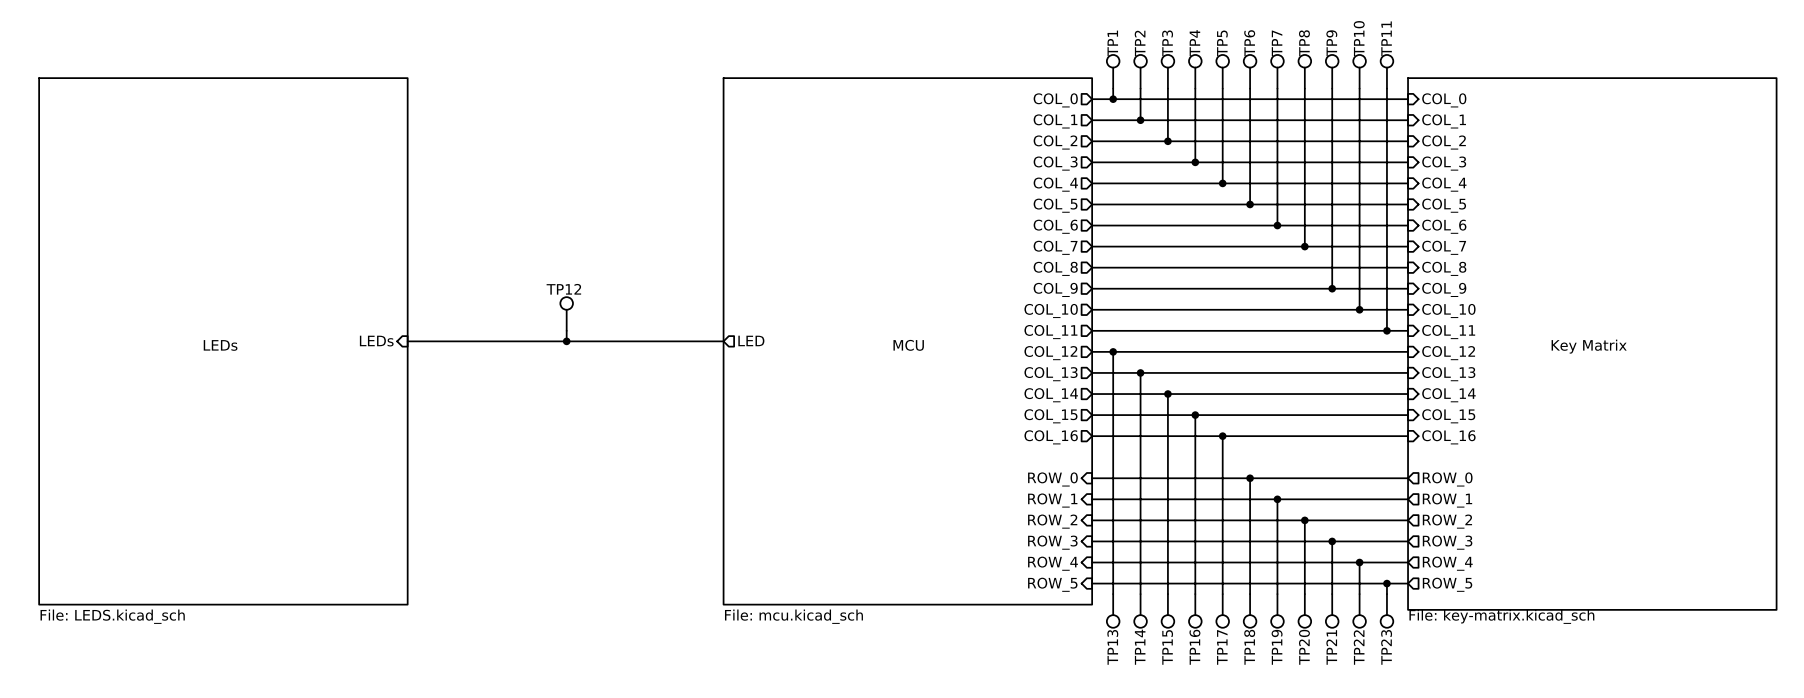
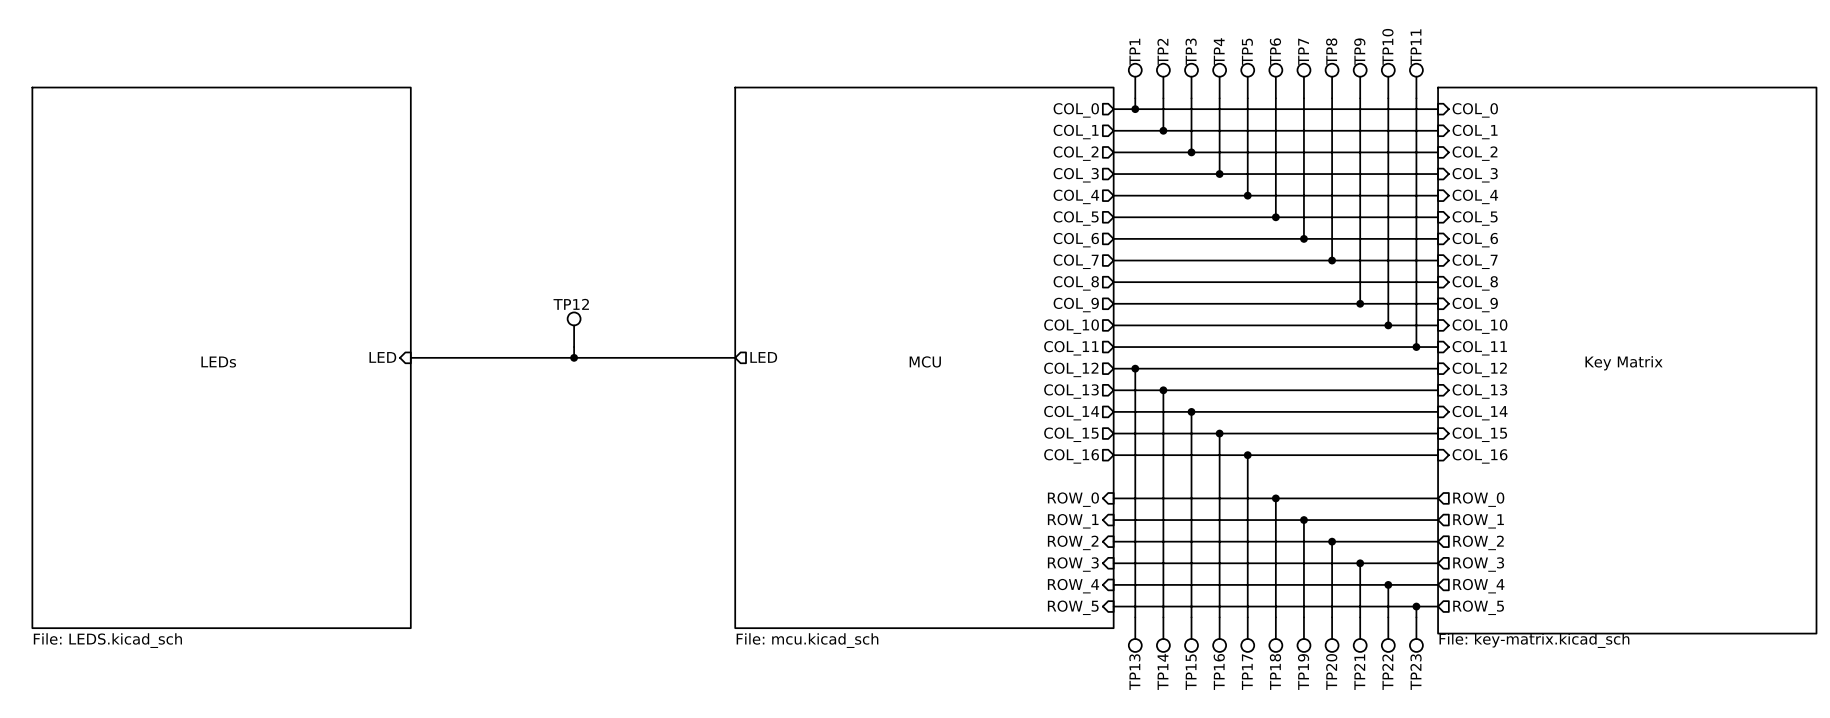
sheet pin: LEDs (376, 341) -> LED (382, 357)

